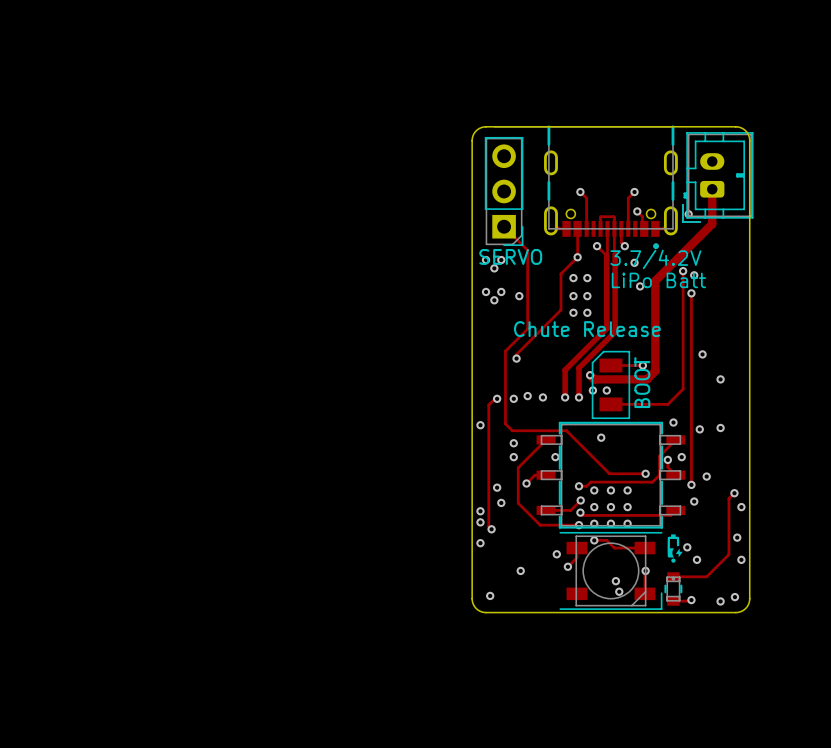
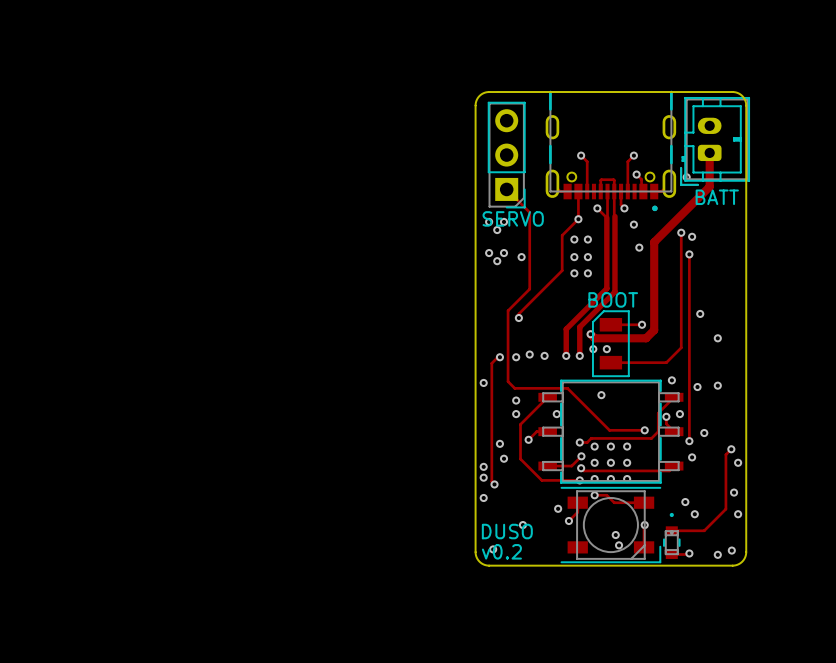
text: none -> BATT (717, 197)
text: 3.7/4.2V (655, 259) -> none
text: LiPo Batt (658, 280) -> none
text: Chute Release (587, 329) -> none
BOOT name rotation: 0° (642, 382) -> 90° clockwise (613, 299)
drawing: [667, 534, 683, 558] -> none
text: none -> DUSO (507, 531)
text: none -> v0.2 (501, 551)

